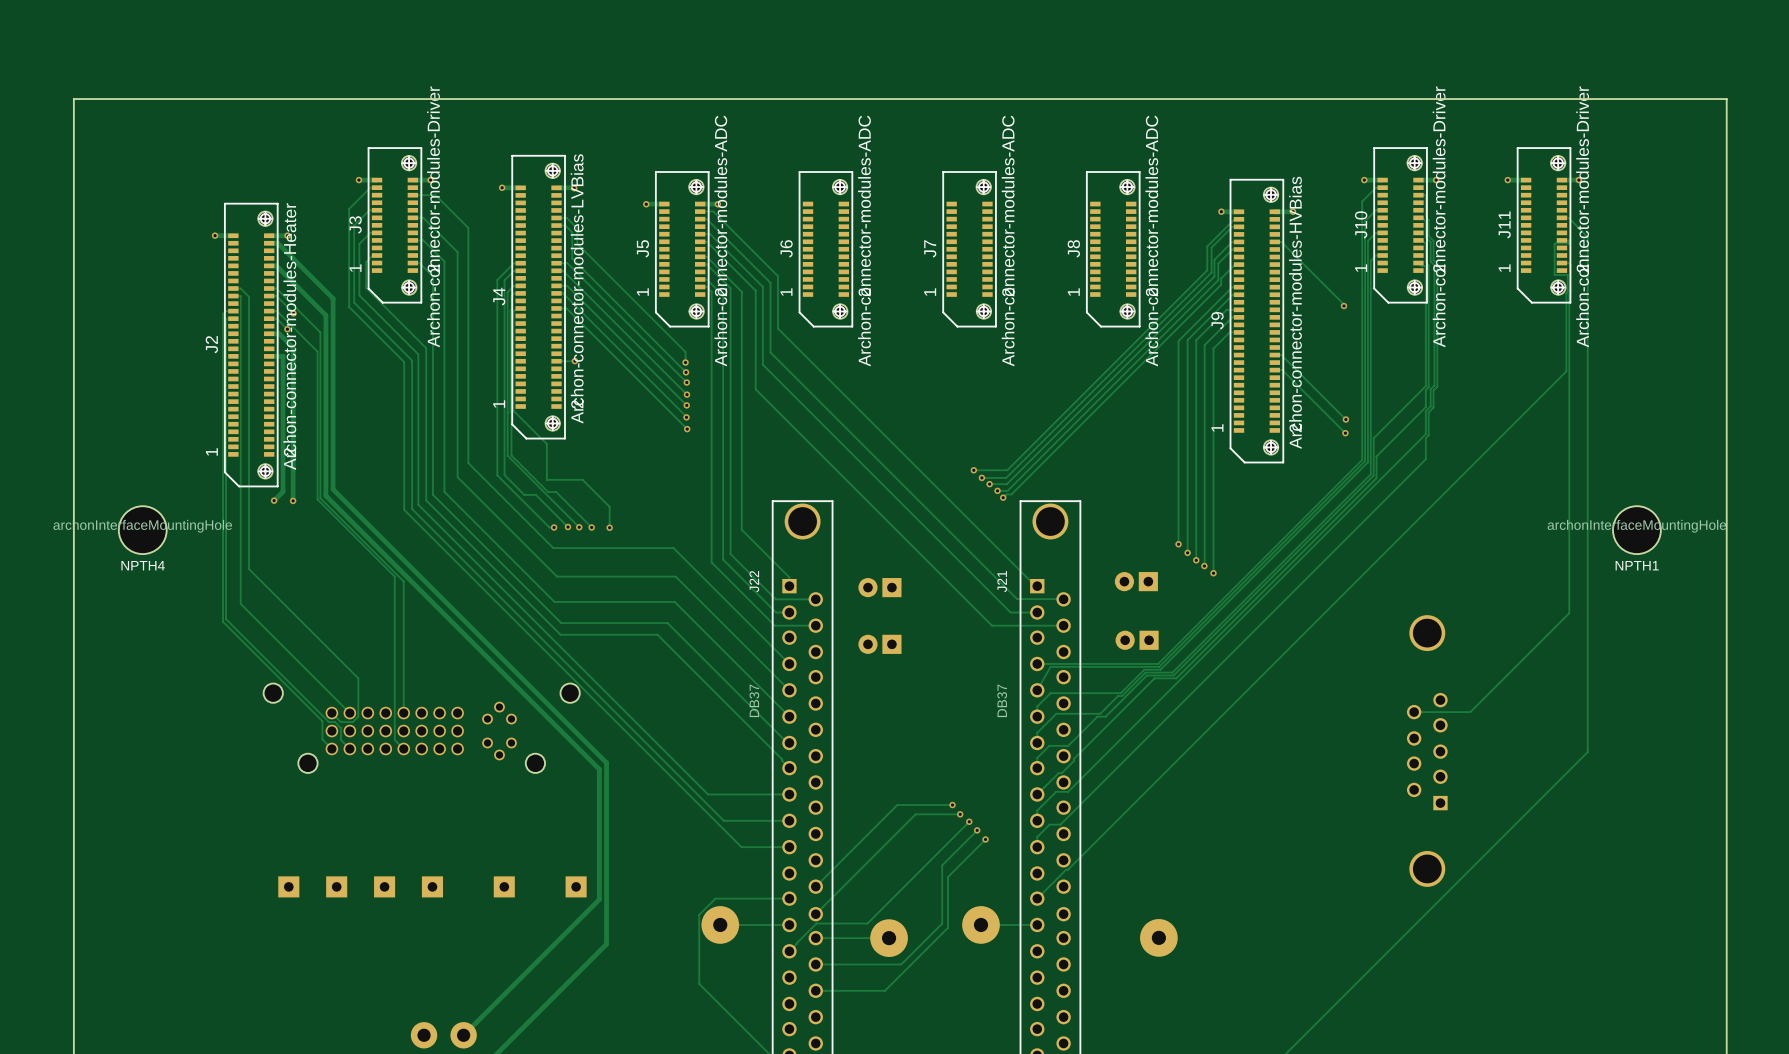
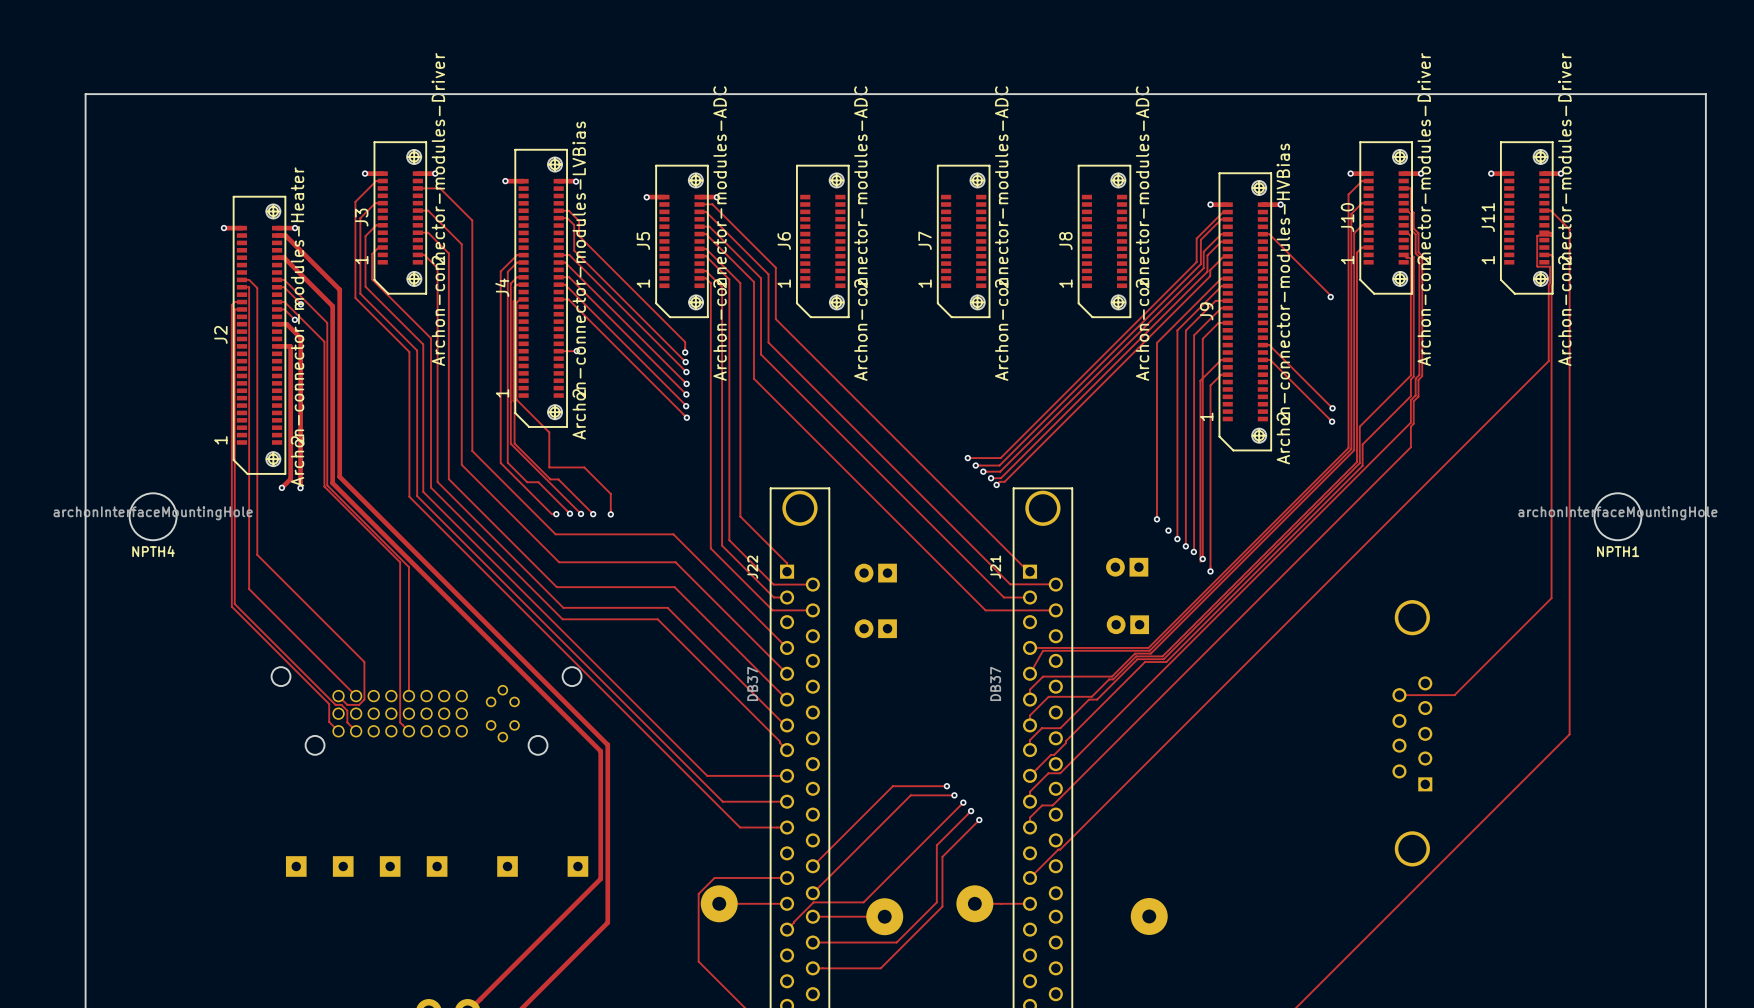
track: (1178, 341) (1178, 544) -> (1168, 331) (1156, 342) (1156, 519)
track: none -> (1227, 359) (1221, 359) (1200, 380) (1200, 561)
track: none -> (1227, 374) (1221, 374) (1210, 385) (1210, 571)
via: none -> (1156, 519)
via: none -> (1210, 571)

